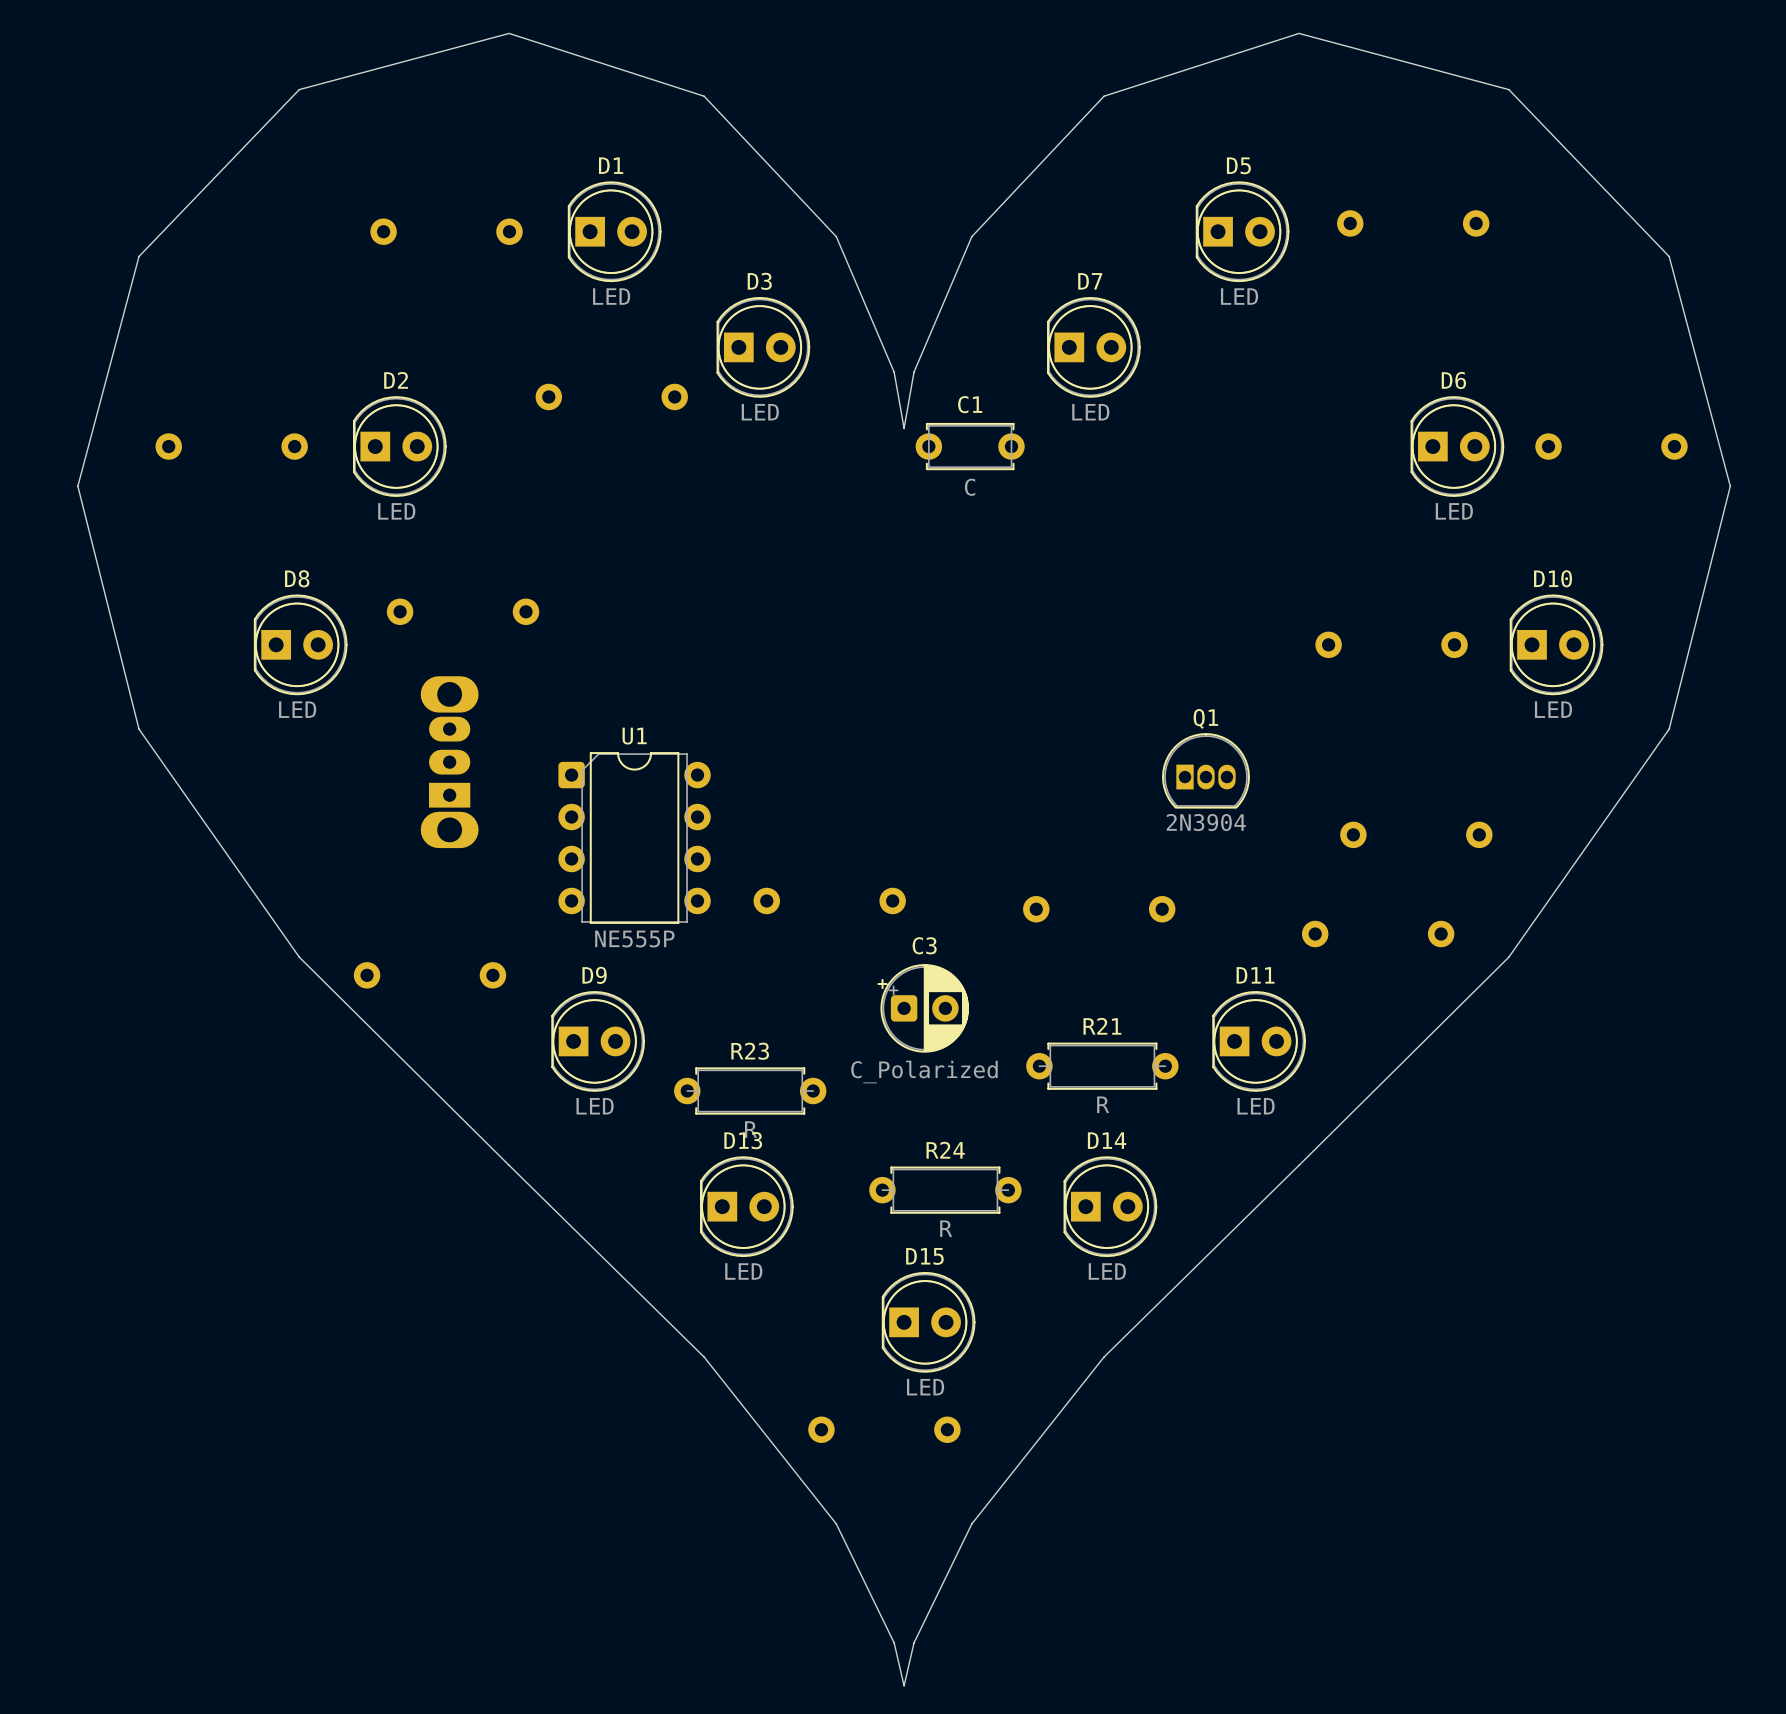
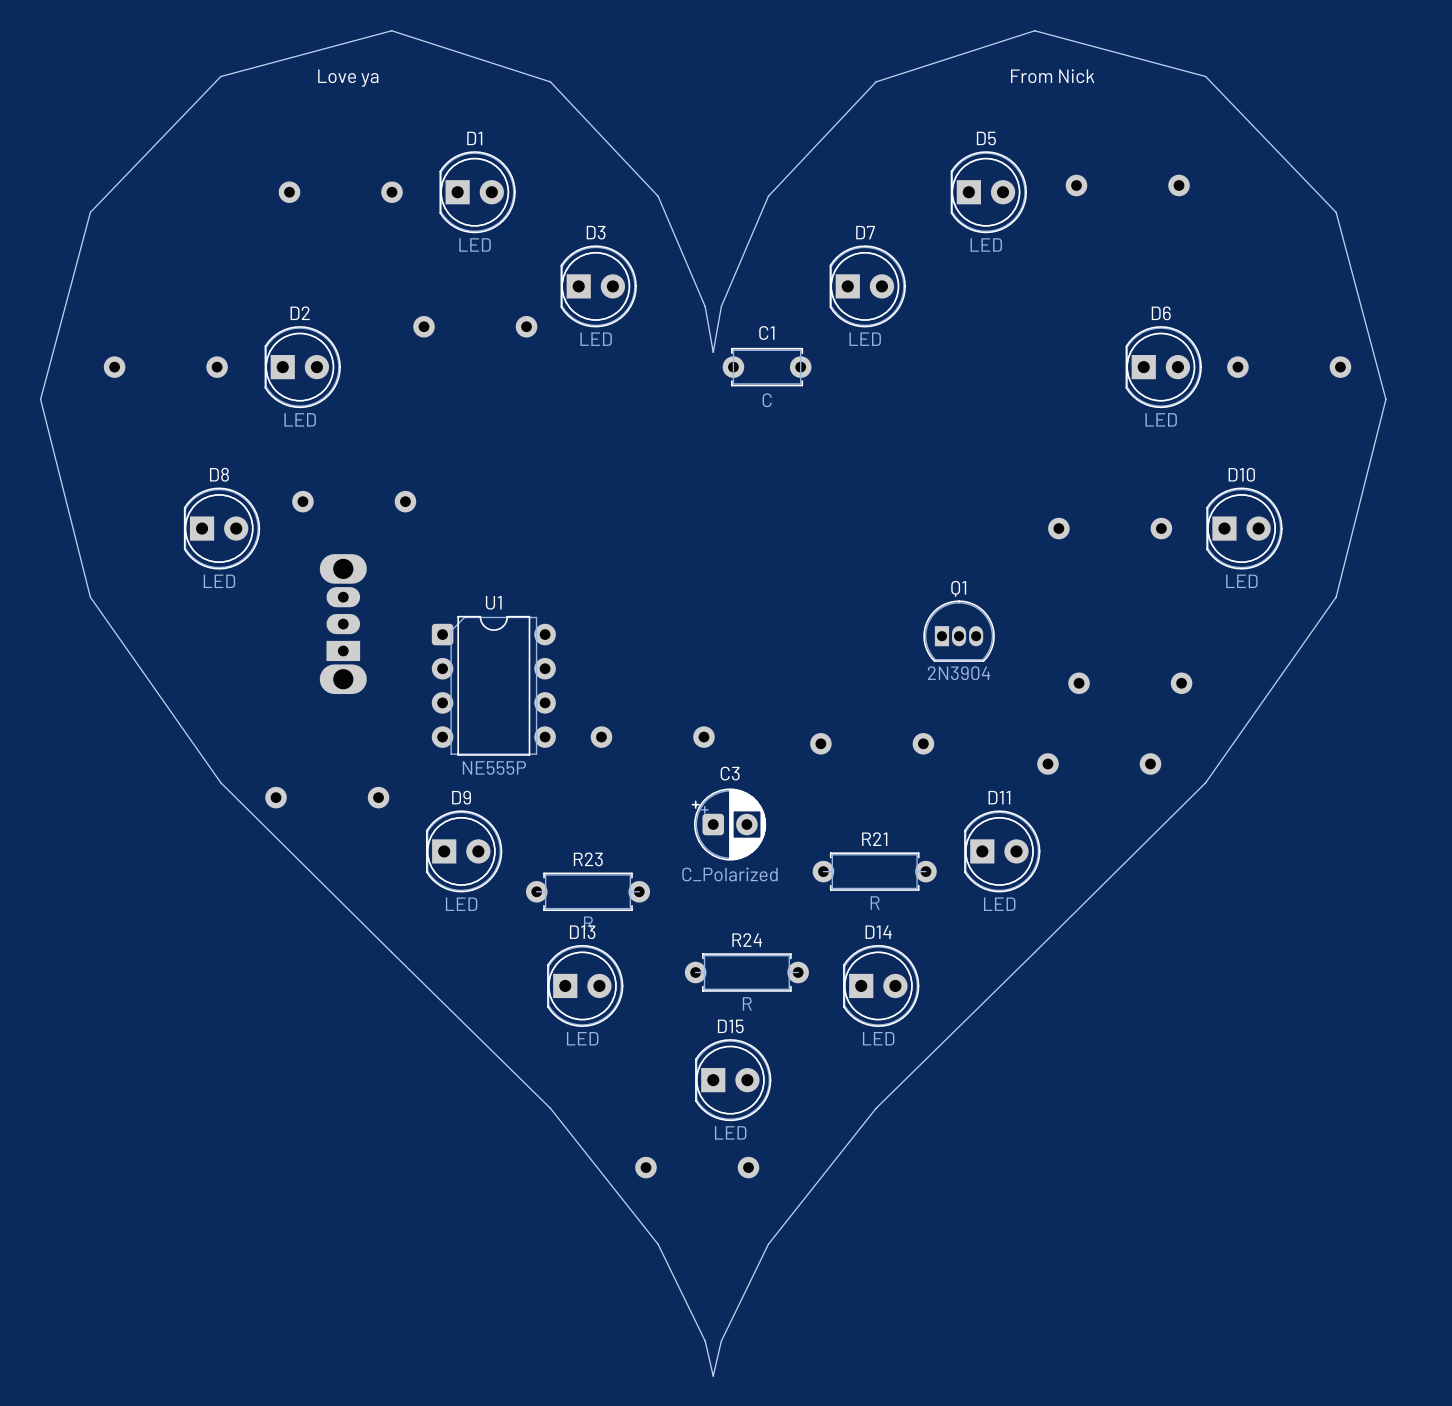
text: none -> From Nick (1052, 76)
text: none -> Love ya (348, 78)

